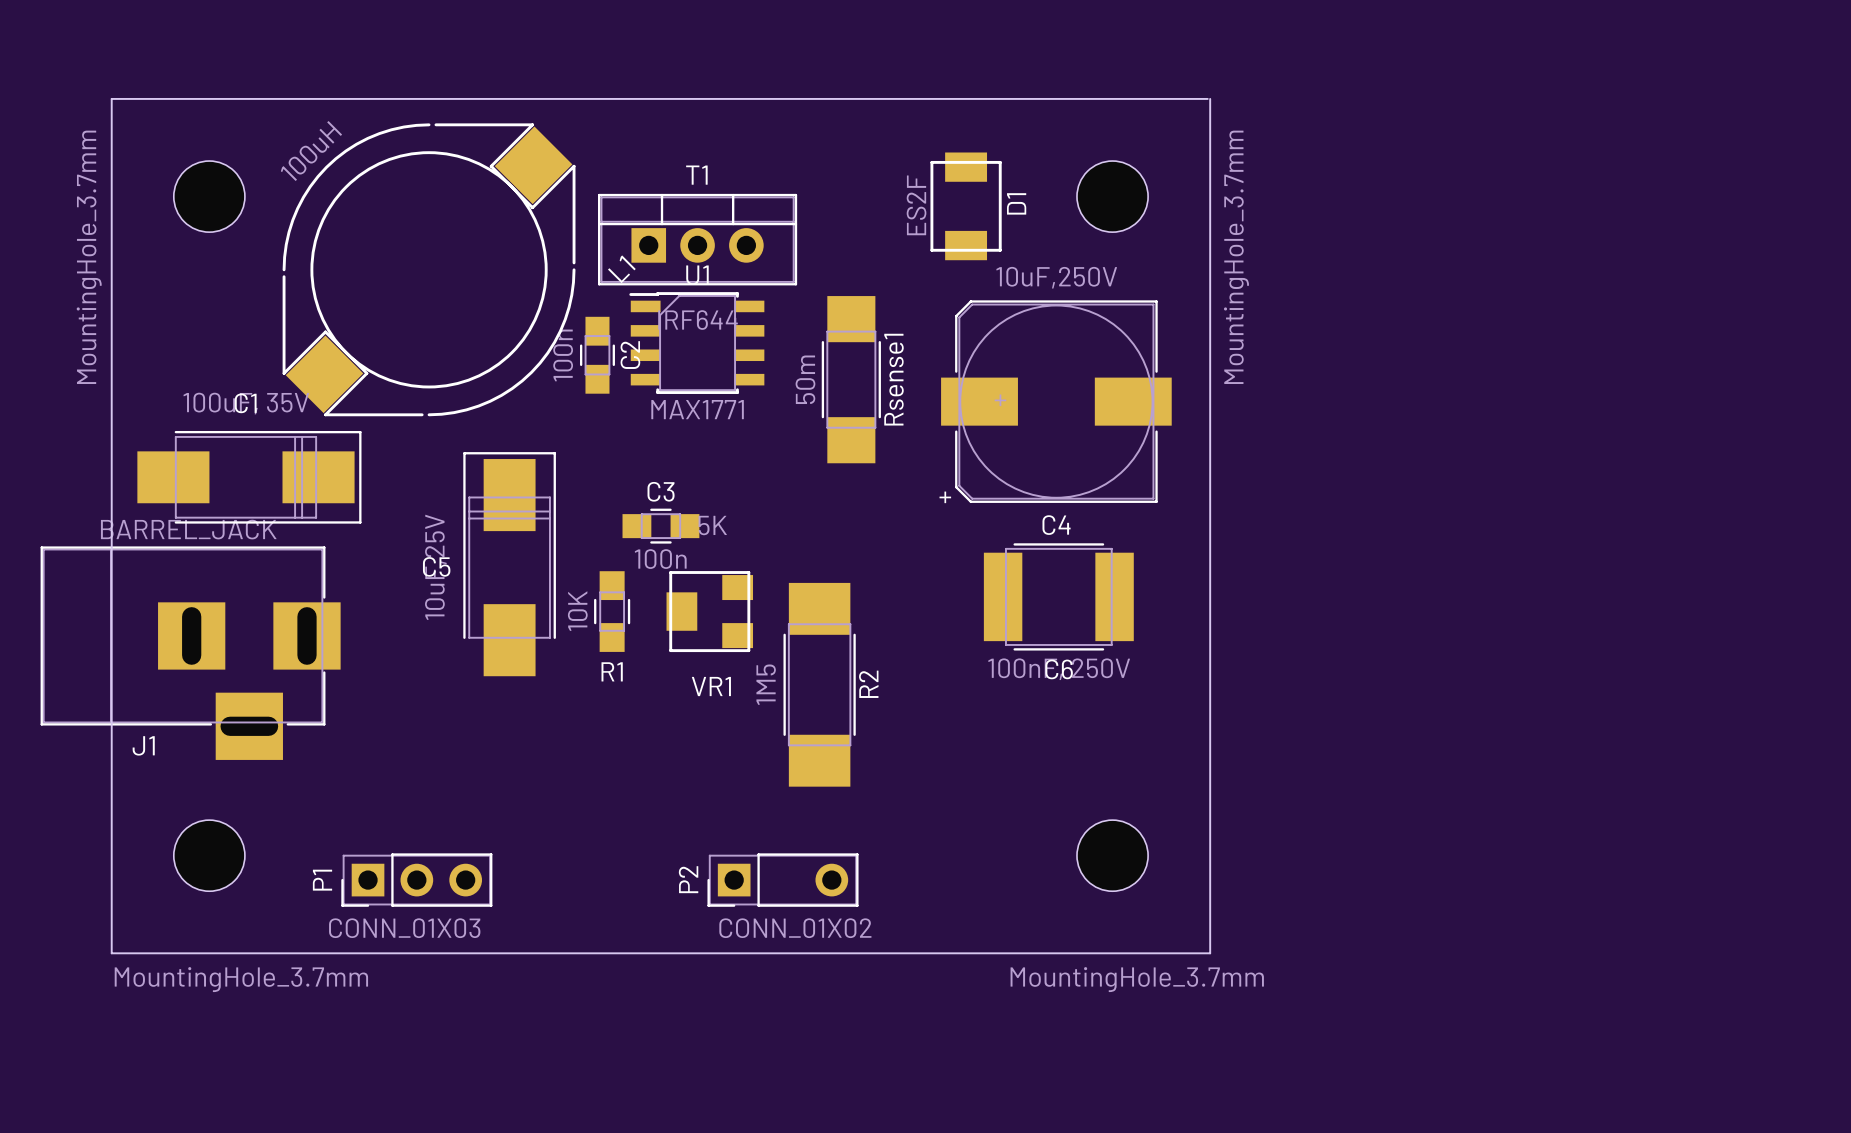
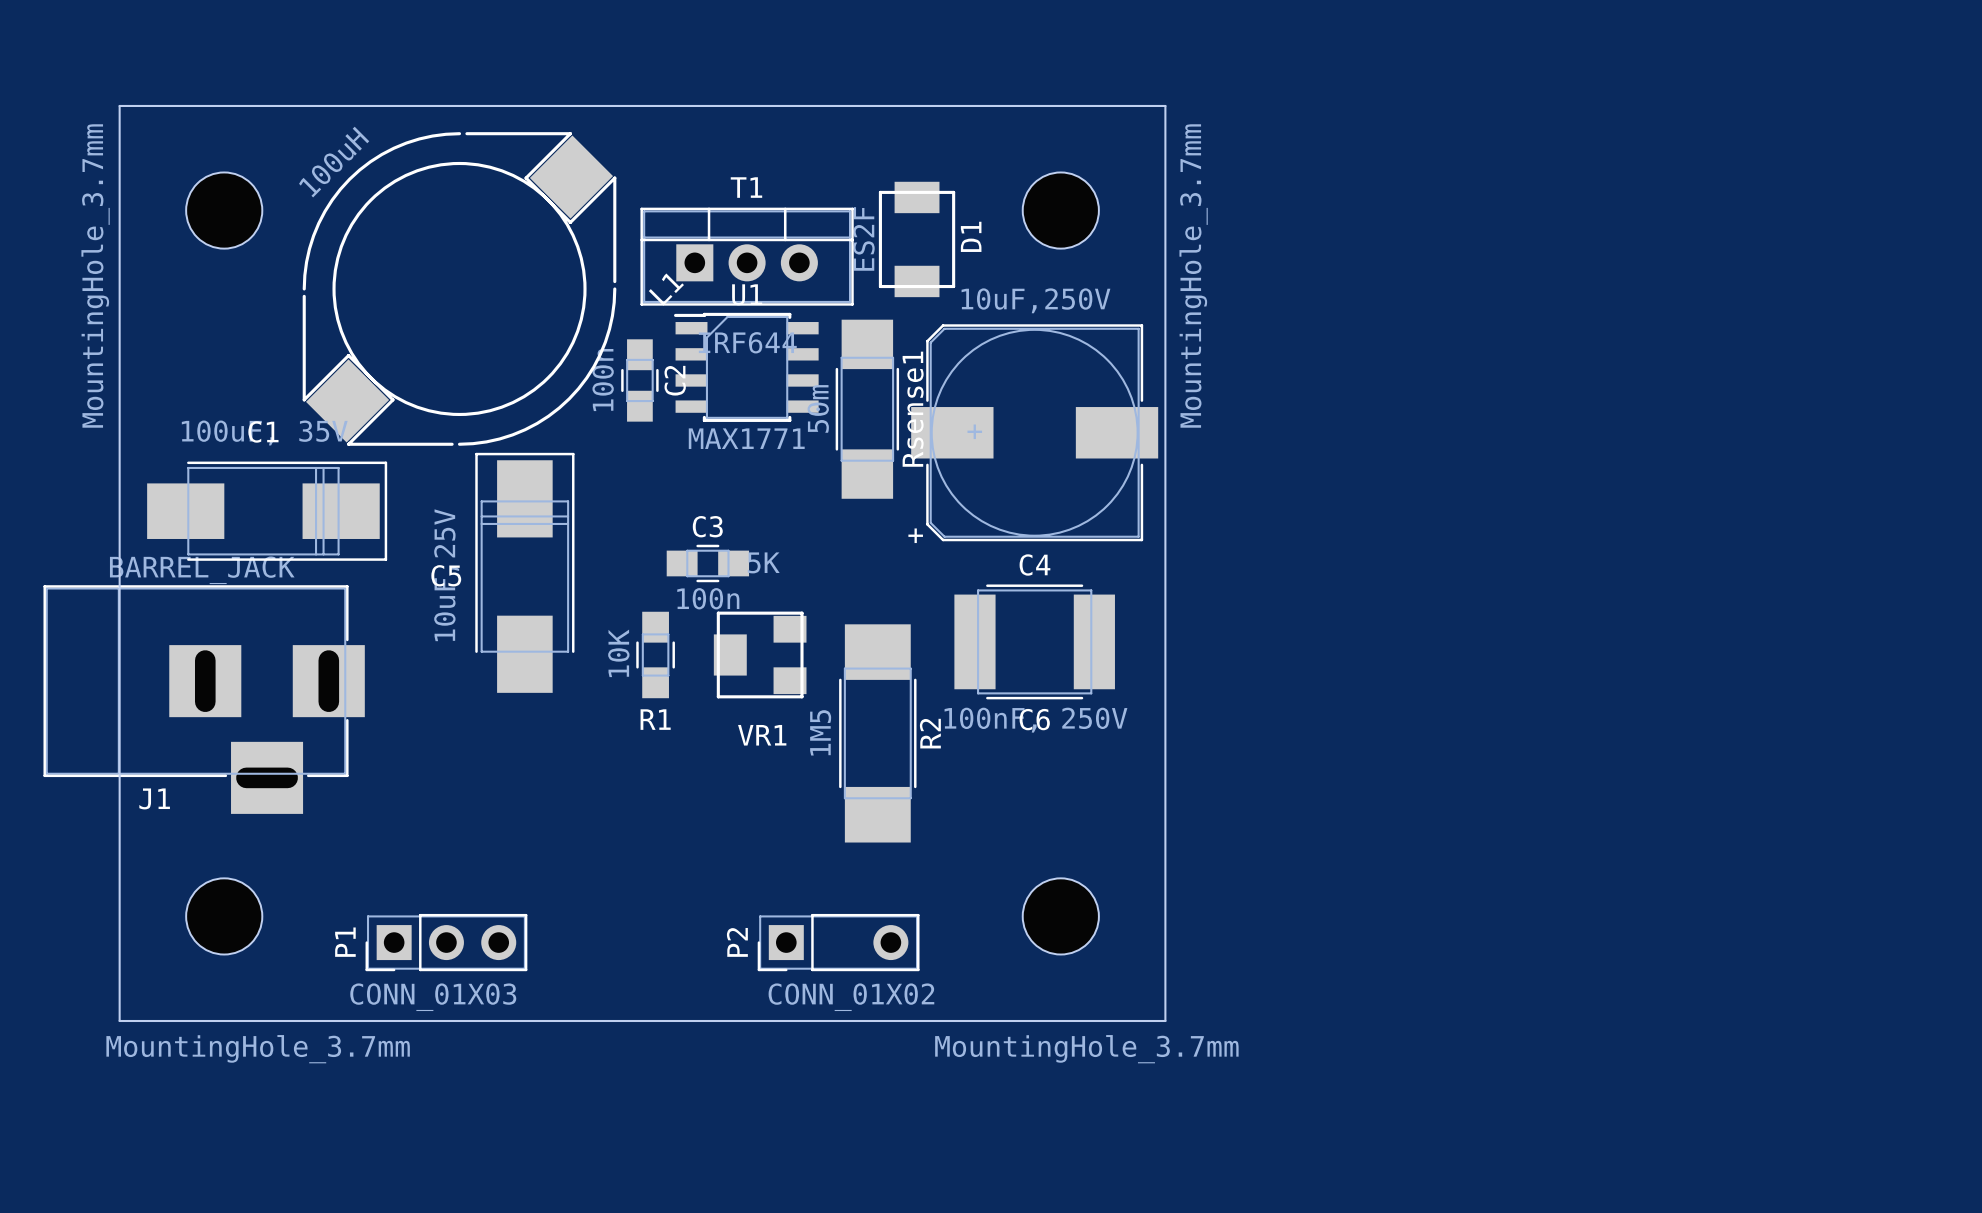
board edge: (1088, 98) (1207, 98) -> none
board edge: (1210, 98) (1210, 953) (1088, 953) -> (1165, 105) (1165, 1020)
part position: (1112, 196) -> (1060, 210)
D1 position: (966, 206) -> (917, 239)
Rsense1 position: (851, 379) -> (867, 409)
C4 position: (1056, 401) -> (1034, 432)
C5 position: (509, 564) -> (524, 572)
C6 position: (1058, 596) -> (1034, 641)
part position: (1112, 855) -> (1060, 916)

